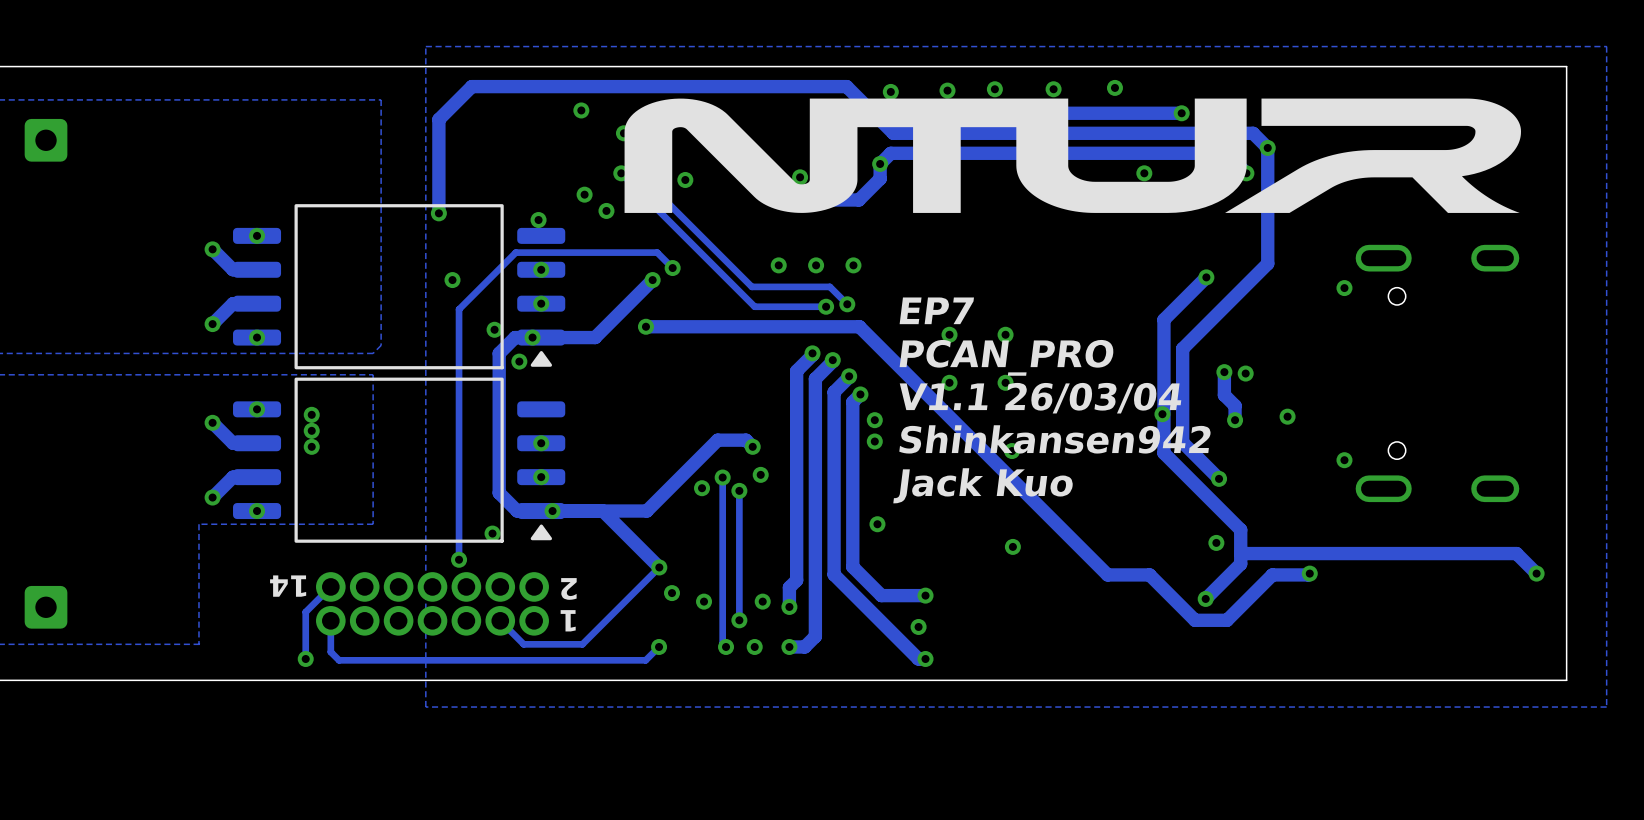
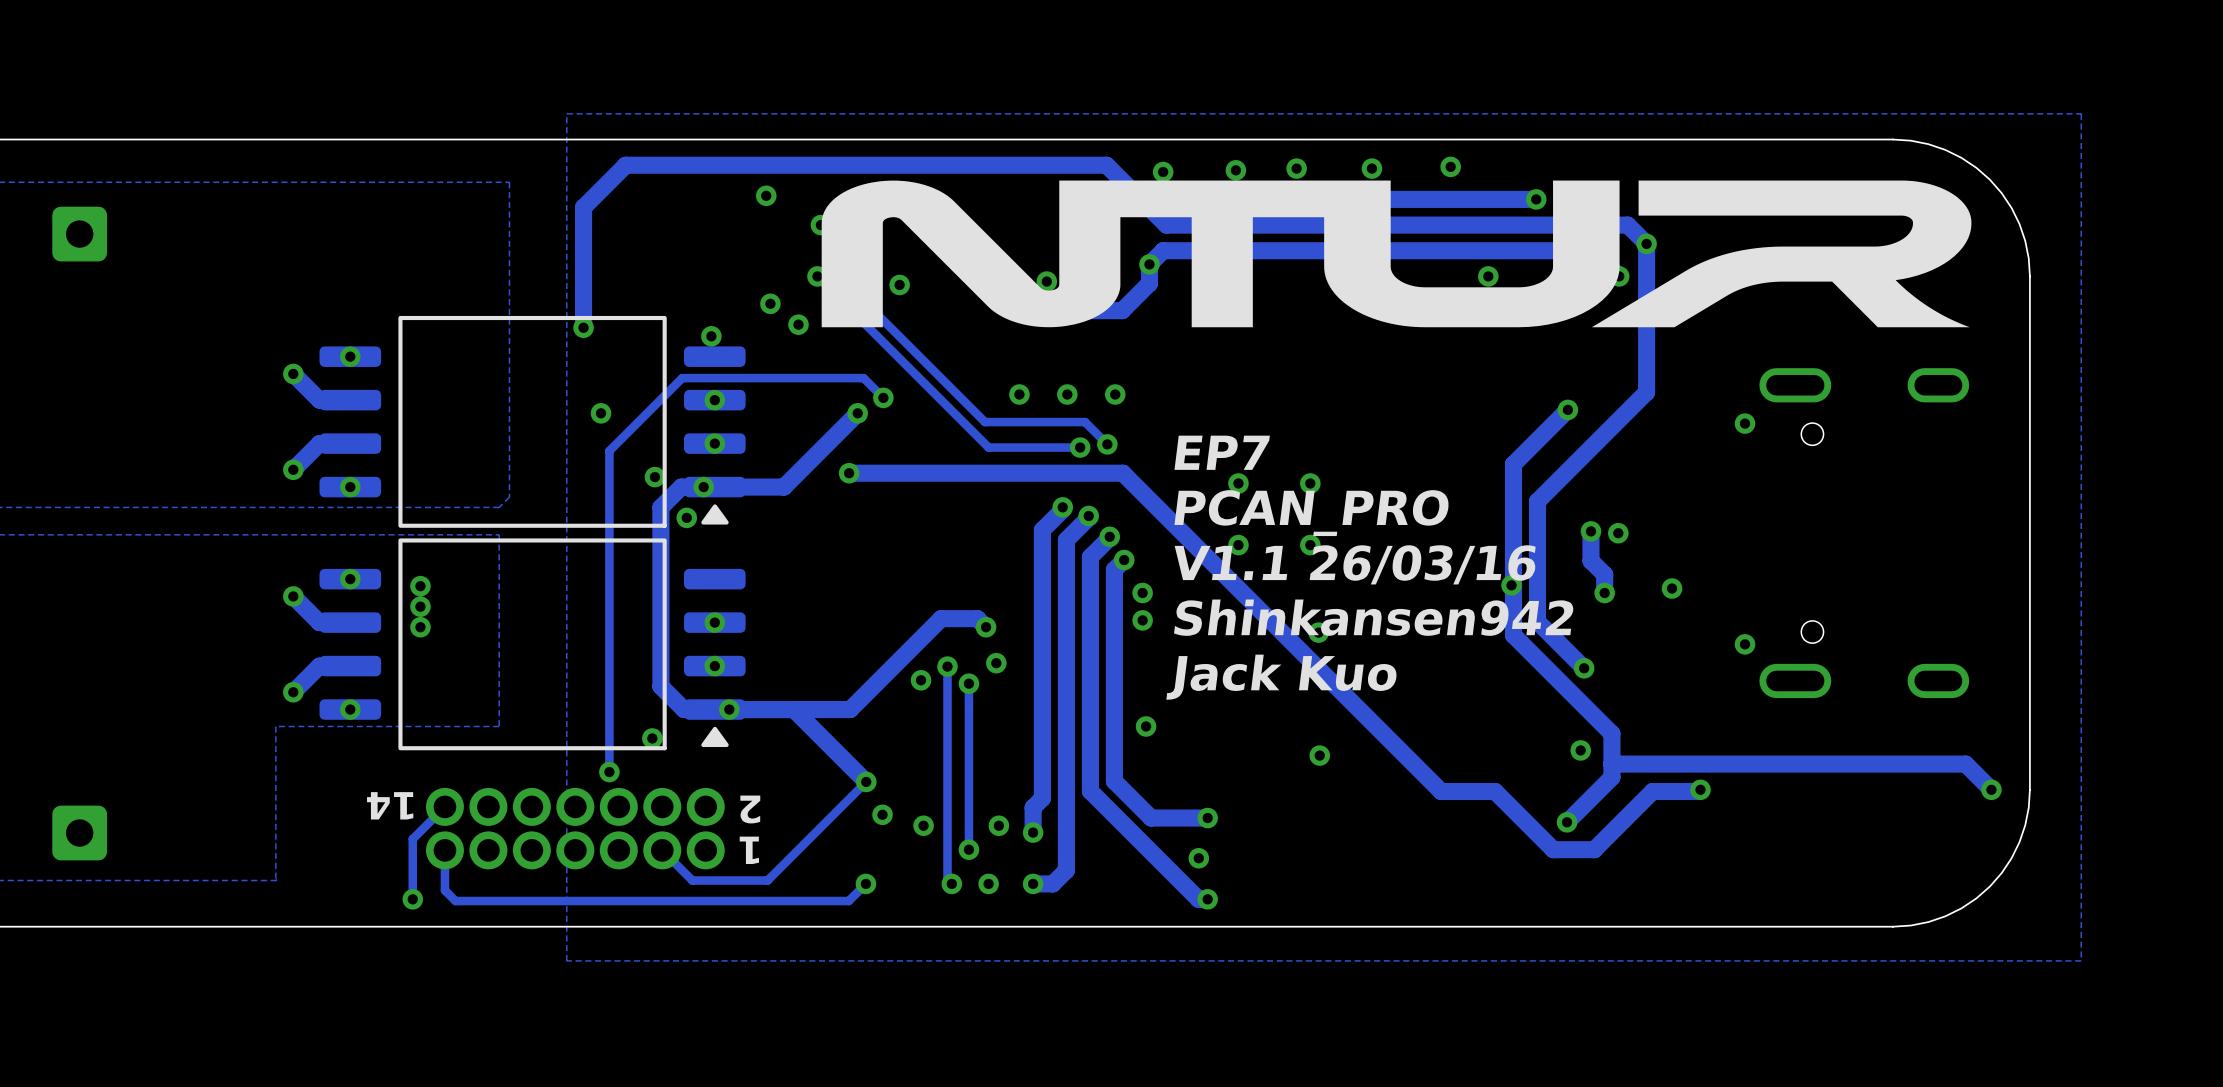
board edge: (1459, 66) (1566, 66) (1566, 173) -> (1893, 139) (1928, 144) (1945, 149) (1976, 167) (1989, 179) (2001, 193) (2019, 224) (2025, 240) (2029, 276)
text: V1.1 26/03/04 (1040, 398) -> V1.1 26/03/16 (1355, 564)
board edge: (1566, 573) (1566, 680) (1459, 680) -> (2029, 789) (2028, 807) (2019, 842) (2001, 873) (1989, 886) (1961, 908) (1945, 916) (1928, 922) (1893, 926)

